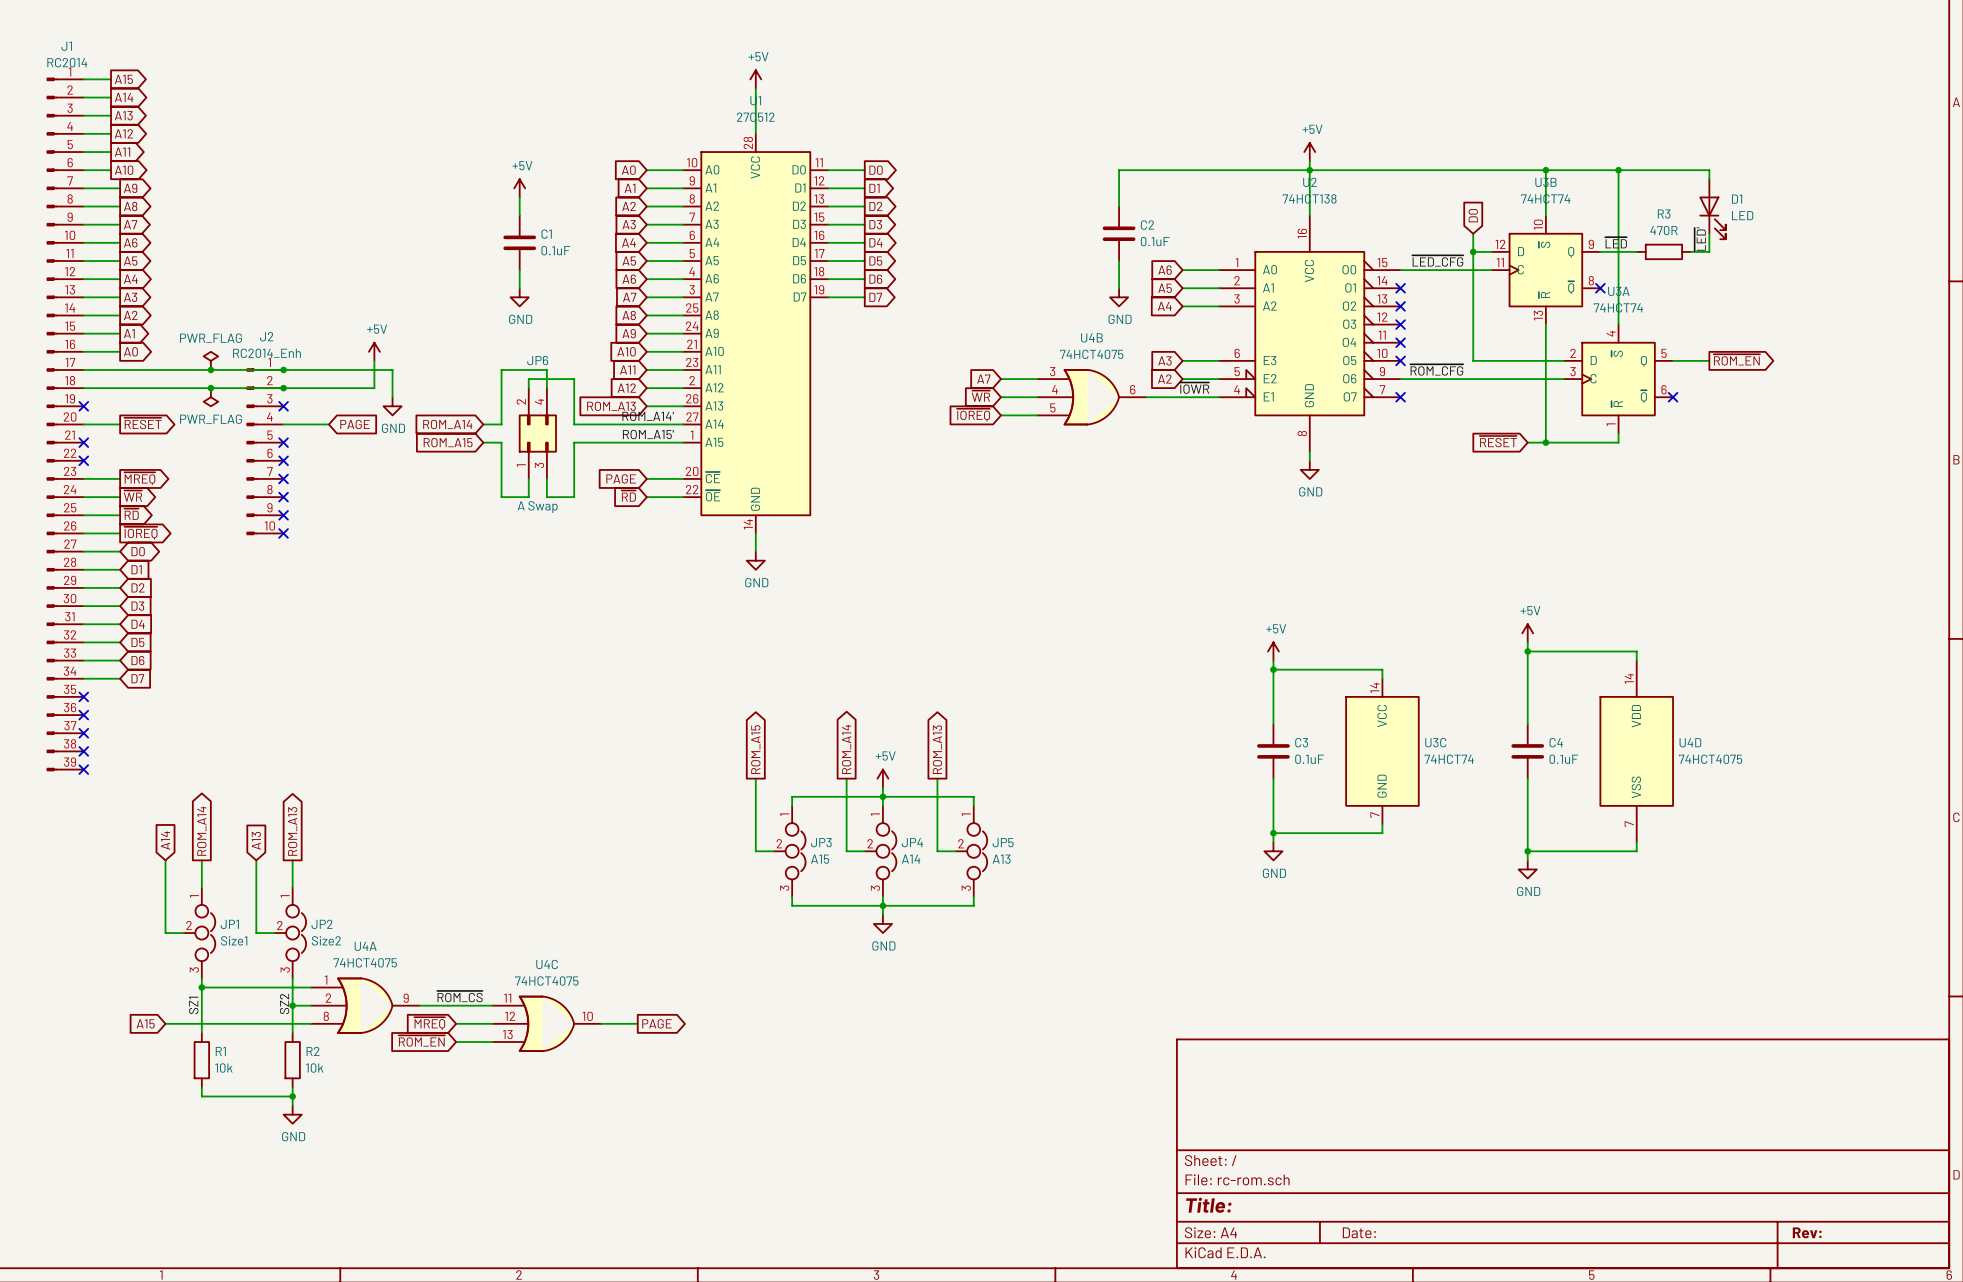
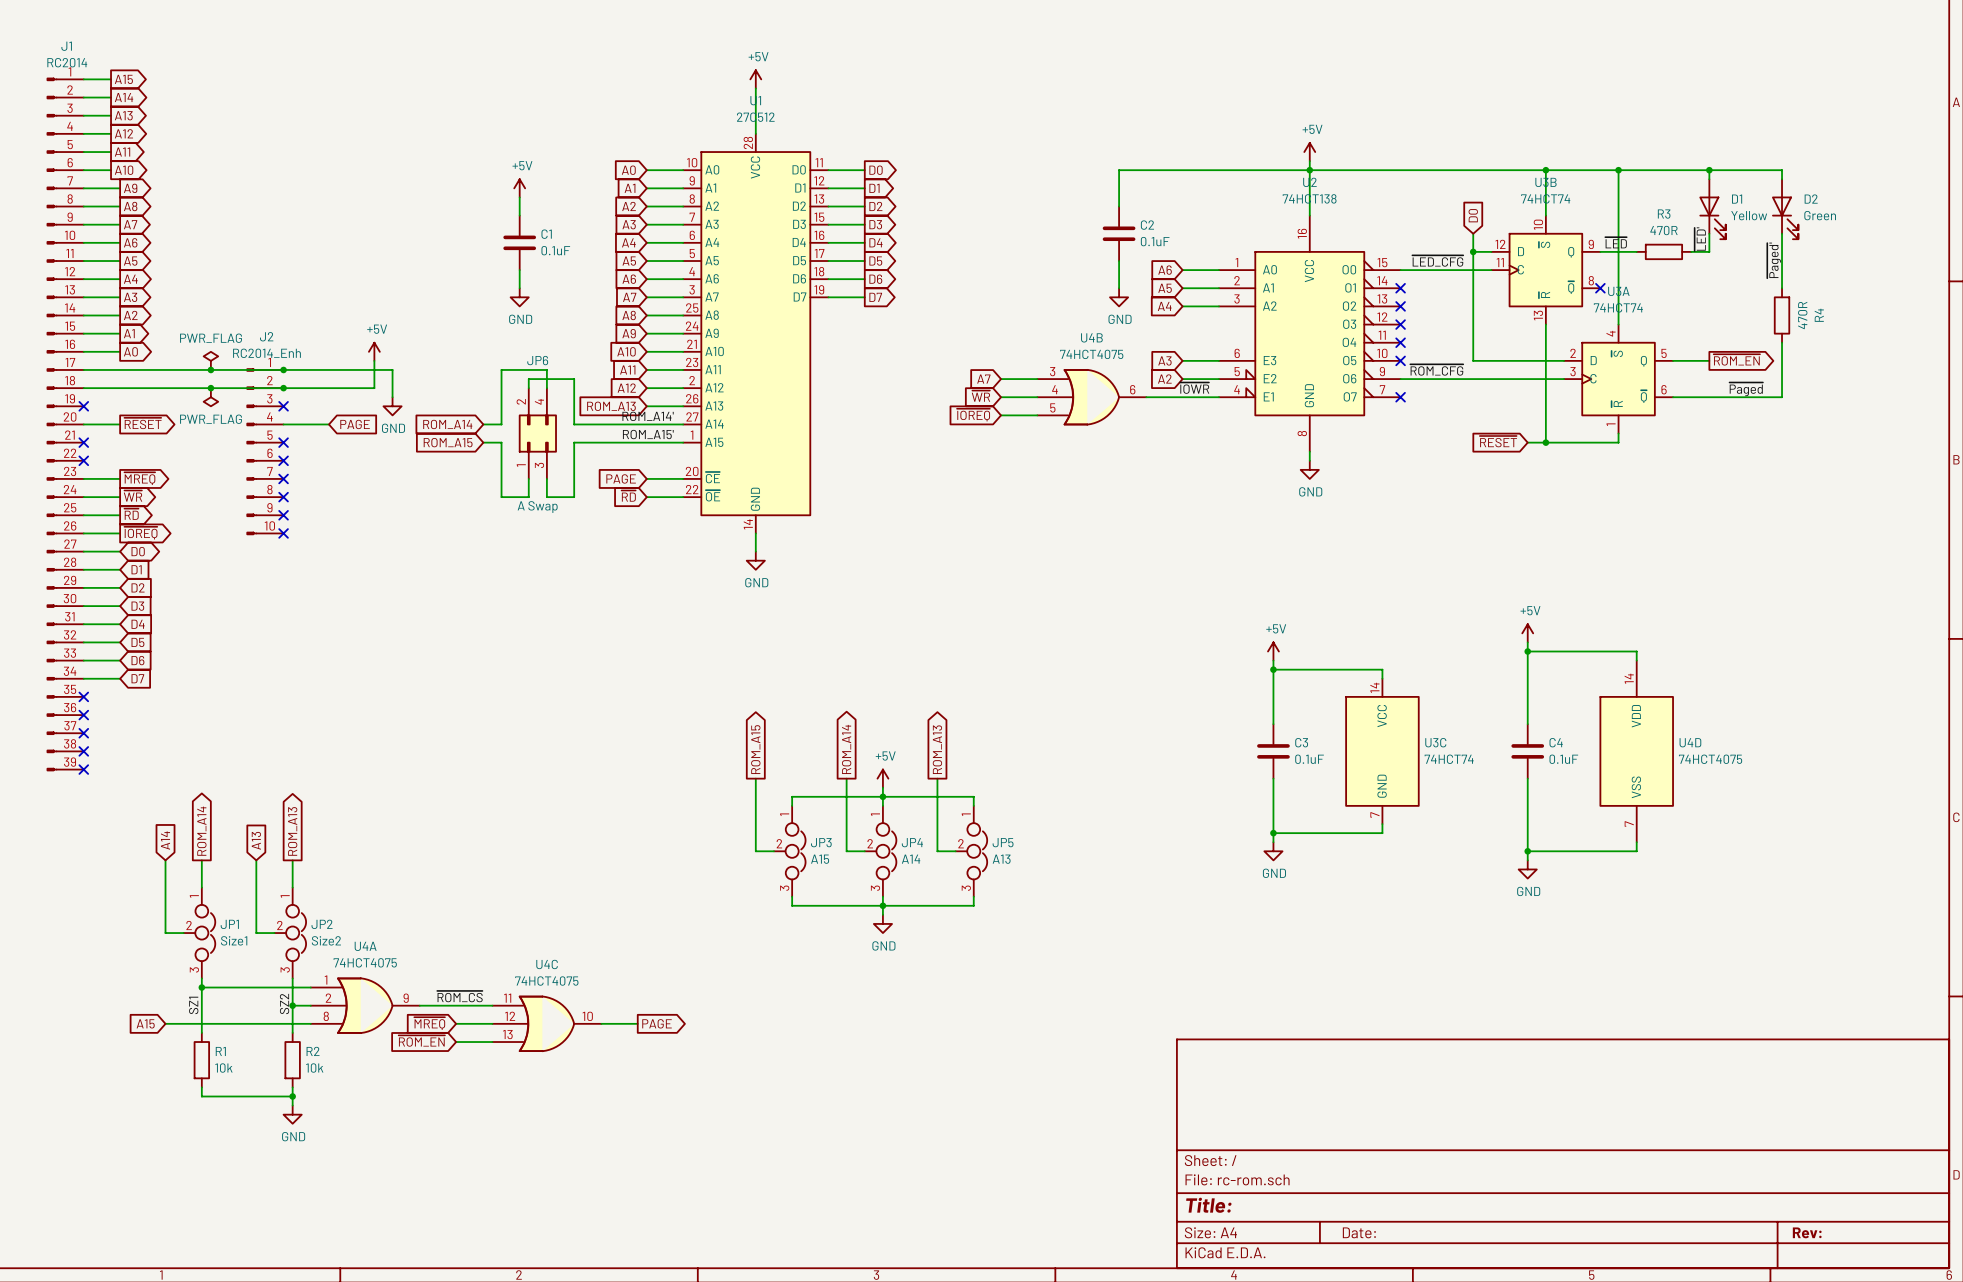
wire: none -> (1709, 170) (1782, 170) (1782, 179)
junction: none -> (1709, 170)
D2: none -> Green (1785, 209)
D1 value: LED (1742, 215) -> Yellow (1749, 215)
wire: none -> (1782, 233) (1782, 288)
label: none -> ~{Paged'} (1774, 260)
R4: none -> 470R (1782, 315)
wire: none -> (1782, 342) (1782, 397) (1673, 397)
label: none -> ~{Paged} (1746, 389)
no-connect mark: (1673, 397) -> none

